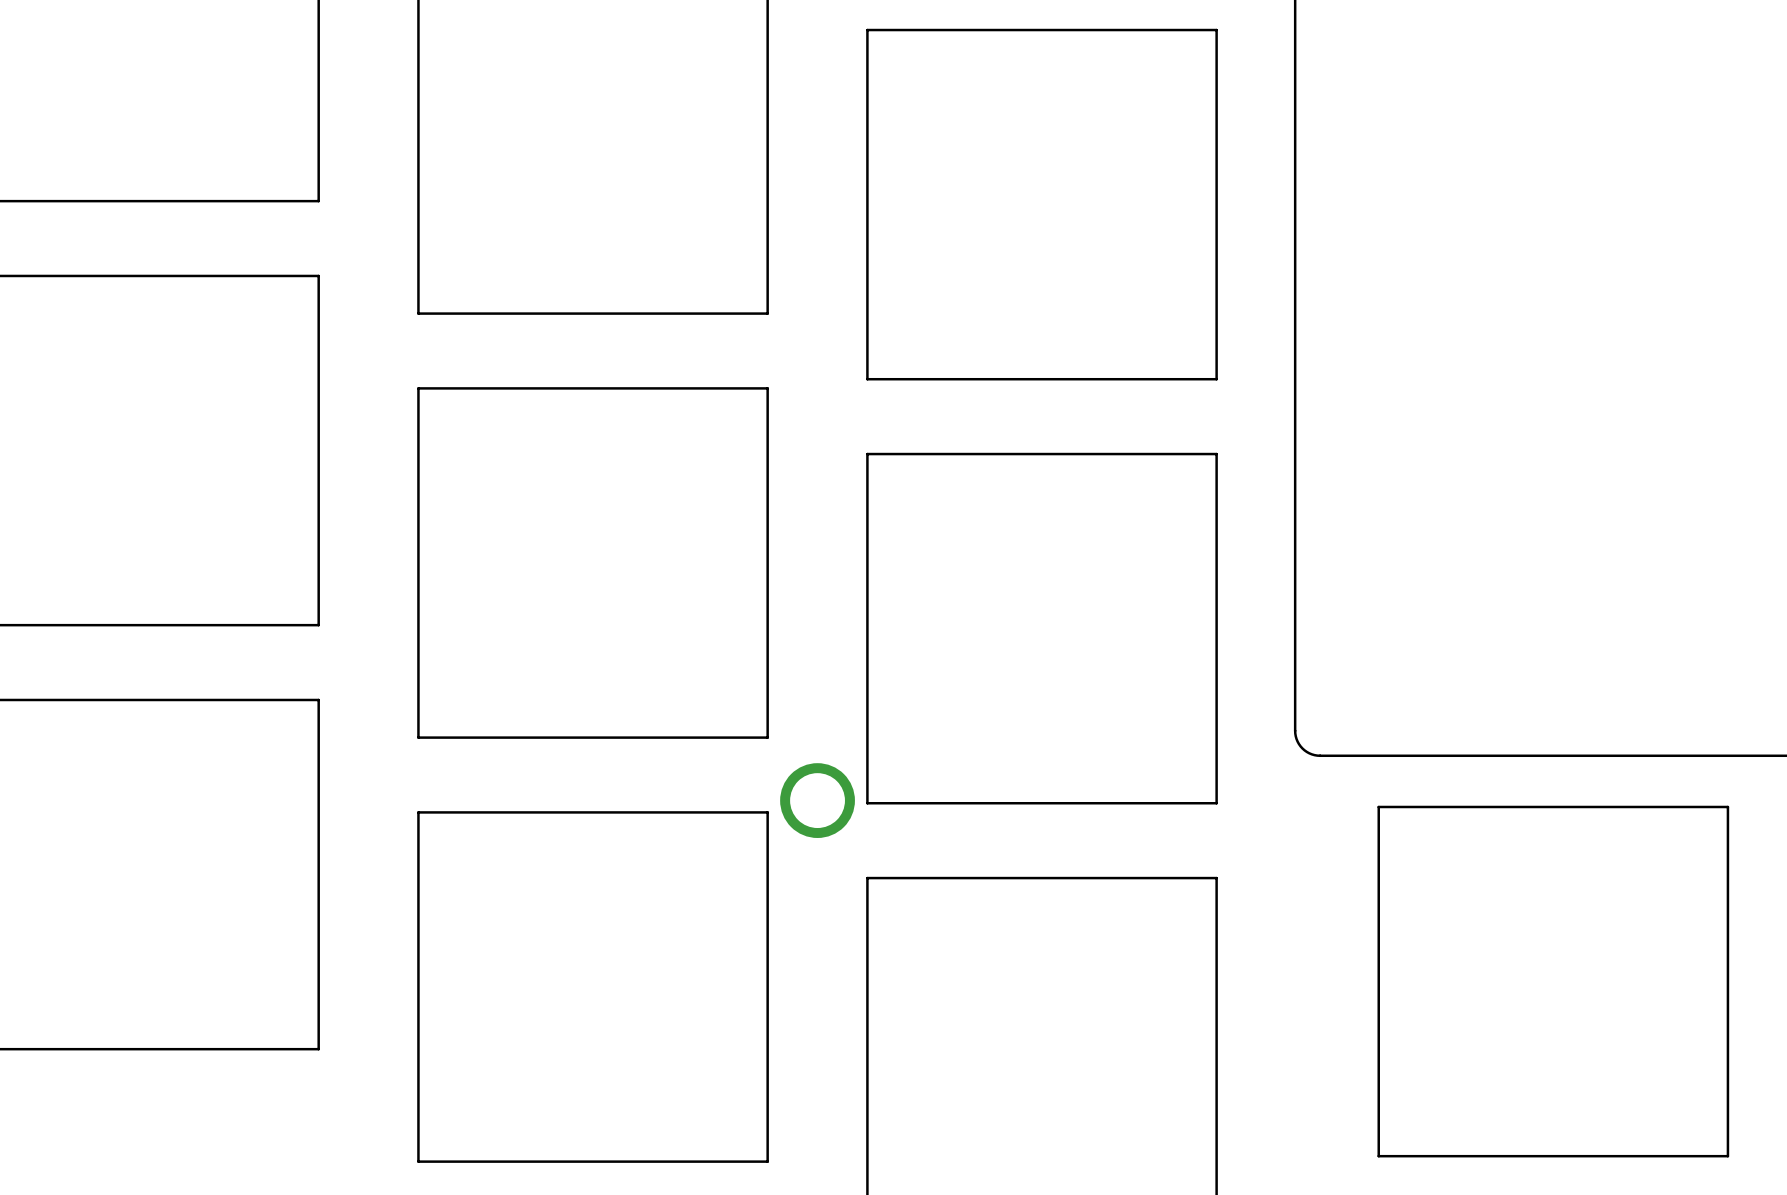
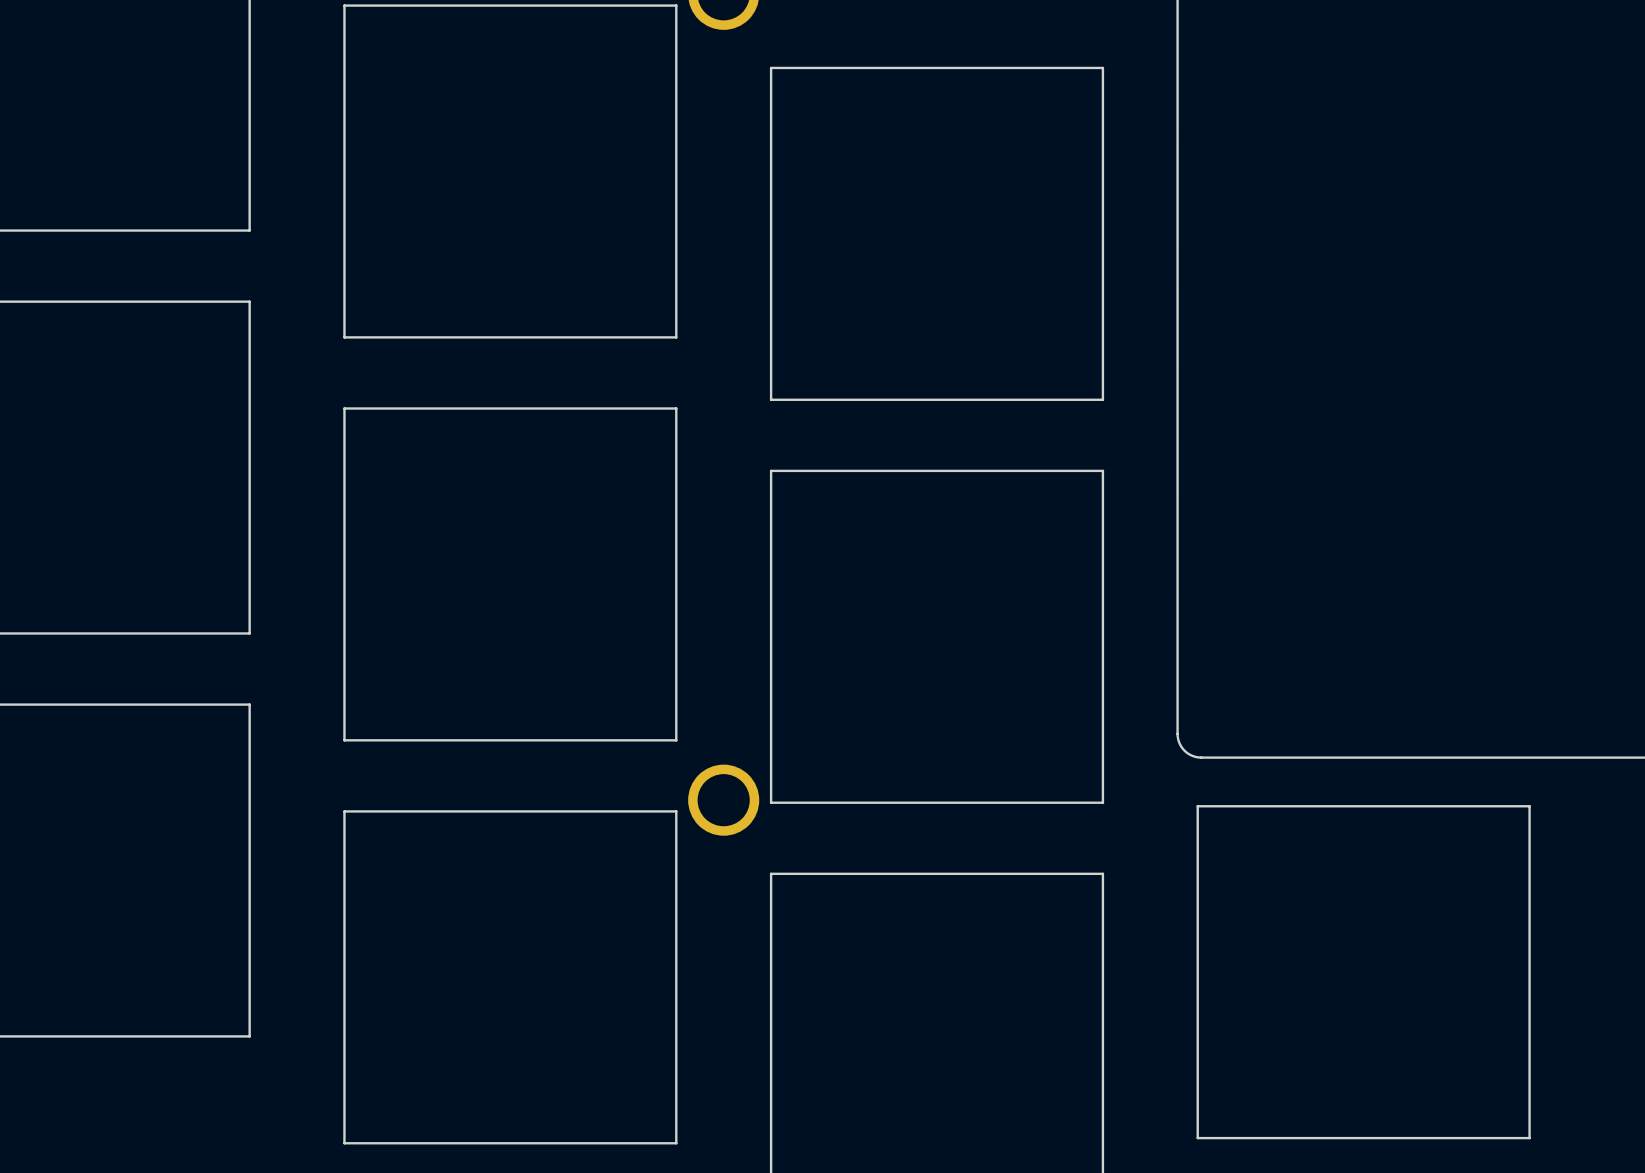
board edge: (1378, 806) (1378, 1156) -> (1256, 806) (1197, 806) (1197, 1138) (1256, 1138)
board edge: (1665, 806) (1727, 806) (1727, 1156) (1665, 1156) -> (1529, 806) (1529, 1138)

